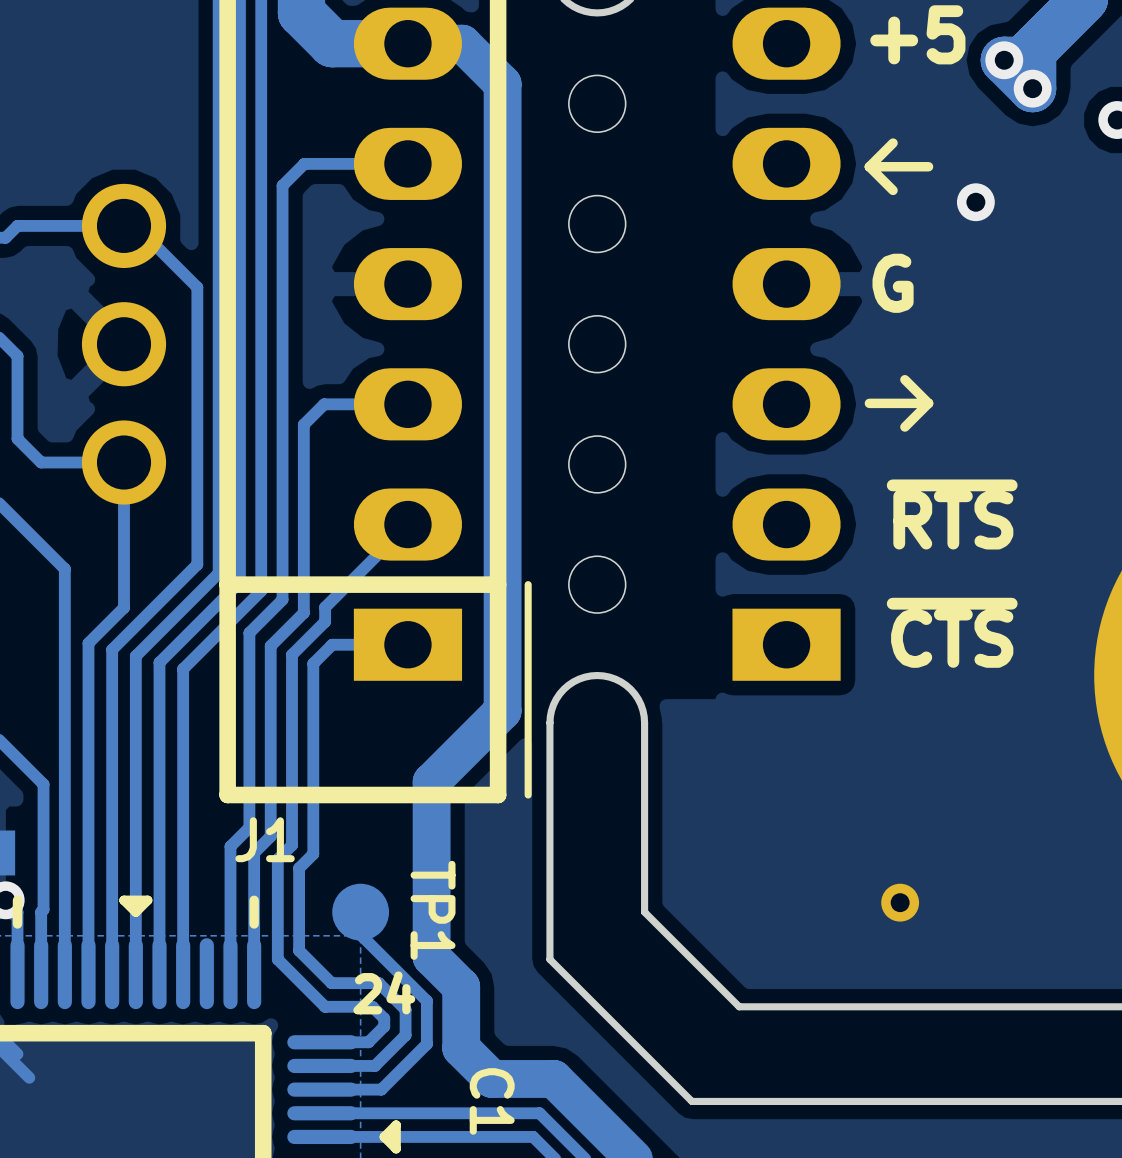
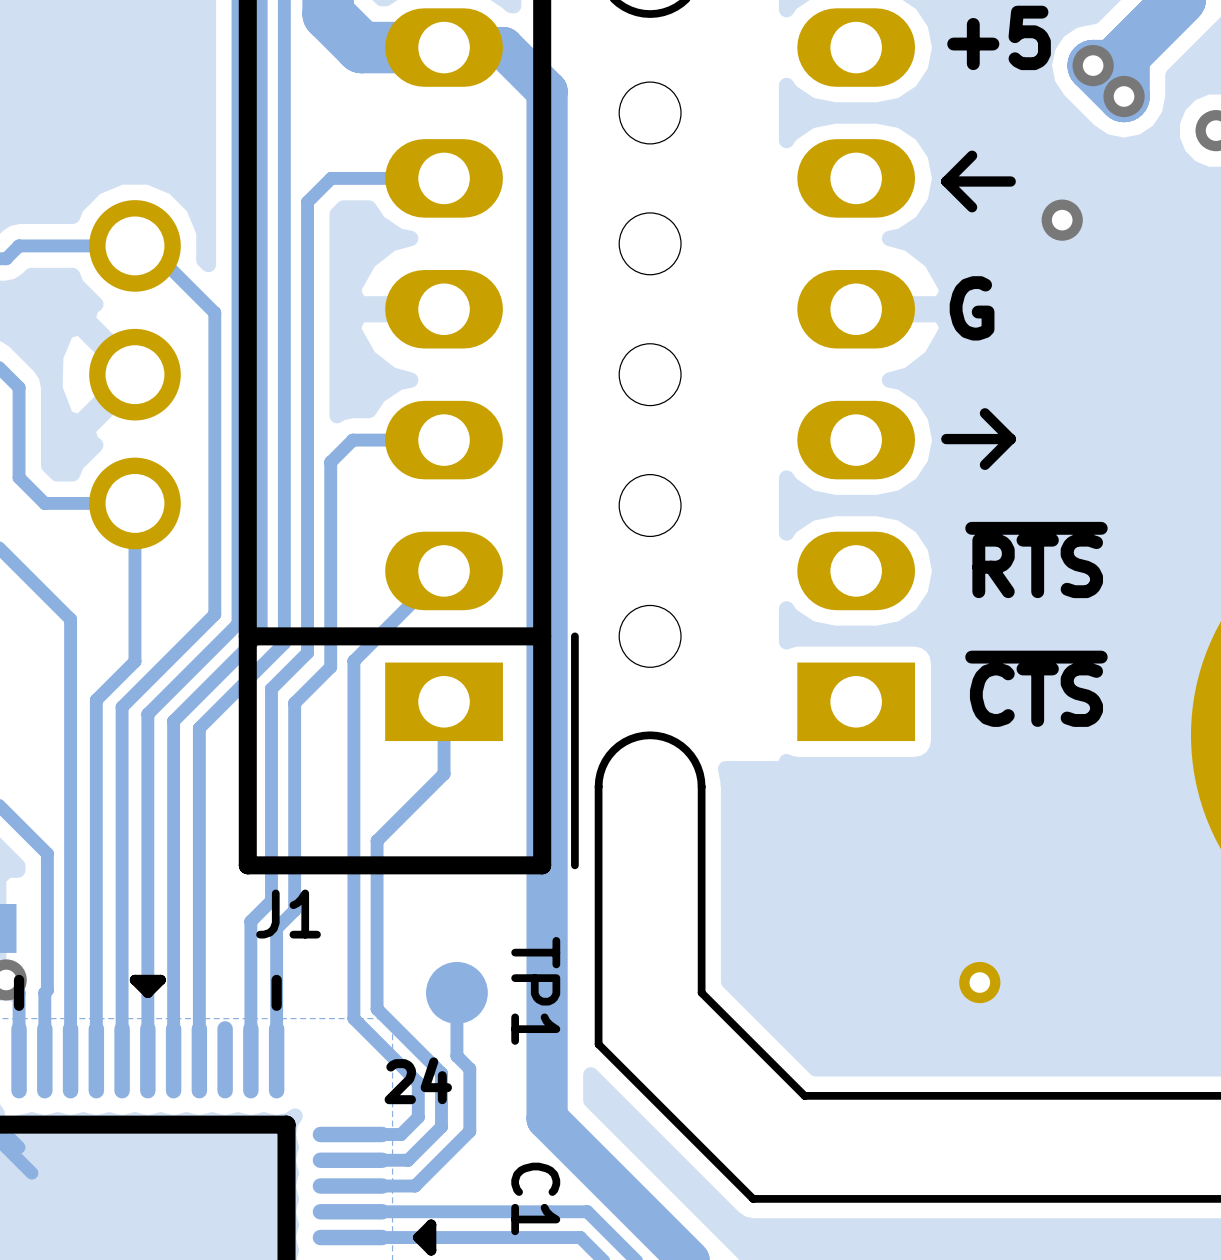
track: (325, 621) (292, 654) (292, 845) (277, 859) (277, 959) (325, 1006) (372, 1006) (384, 1018) -> (353, 676) (353, 1018) (418, 1082) (418, 1108)
track: (407, 644) (332, 644) (313, 663) (313, 854) (299, 868) (299, 950) (331, 983) (378, 983) (405, 1009) -> (444, 701) (444, 773) (377, 840) (377, 1009) (441, 1073) (441, 1099)
track: (502, 711) (431, 781) (431, 957) (461, 986) (461, 1048) (491, 1078) (553, 1078) -> (547, 773) (547, 1118) (602, 1174)
track: (360, 912) (360, 934) (426, 1000) (426, 1044) -> (456, 992) (456, 1056) (469, 1068) (469, 1131) (464, 1136)
TP1 position: (360, 912) -> (456, 992)

